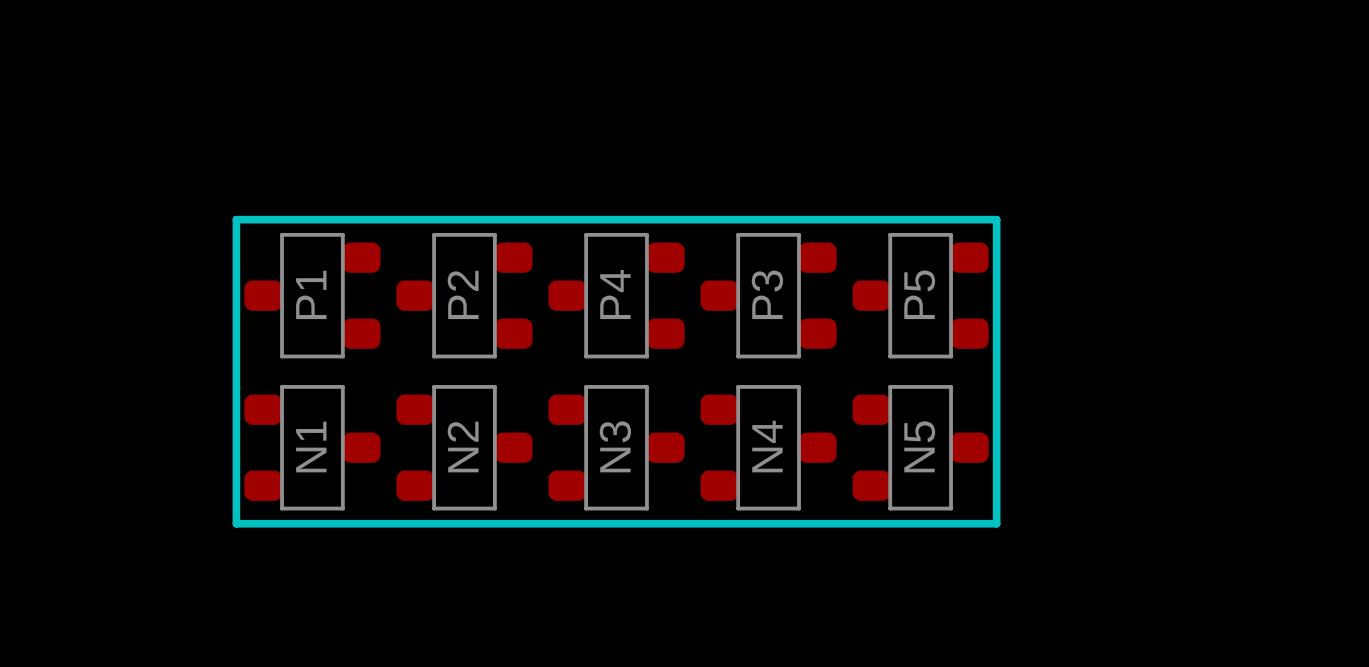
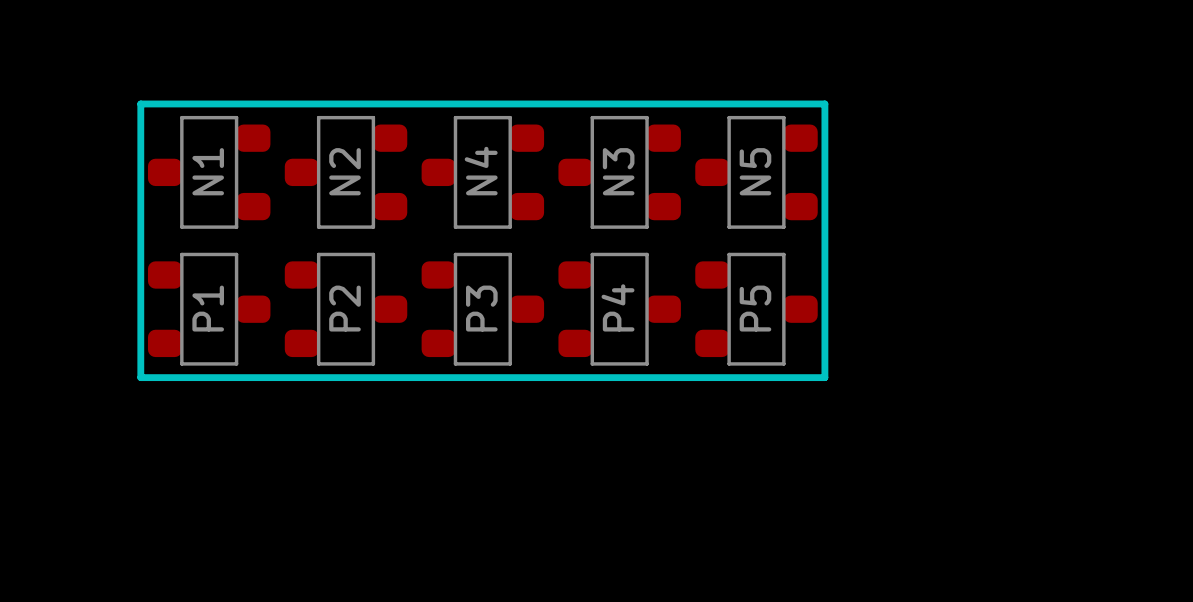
P1 name: P1 (311, 294) -> N1 (208, 171)
P2 name: P2 (463, 294) -> N2 (345, 171)
P4 name: P4 (615, 294) -> N4 (481, 171)
P3 name: P3 (767, 294) -> N3 (618, 171)
P5 name: P5 (919, 294) -> N5 (755, 171)
N1 name: N1 (311, 446) -> P1 (208, 308)
N3 name: N3 (615, 446) -> P3 (481, 308)
N4 name: N4 (767, 446) -> P4 (617, 307)
N5 name: N5 (919, 446) -> P5 (755, 308)
N2 name: N2 (463, 447) -> P2 (345, 308)

